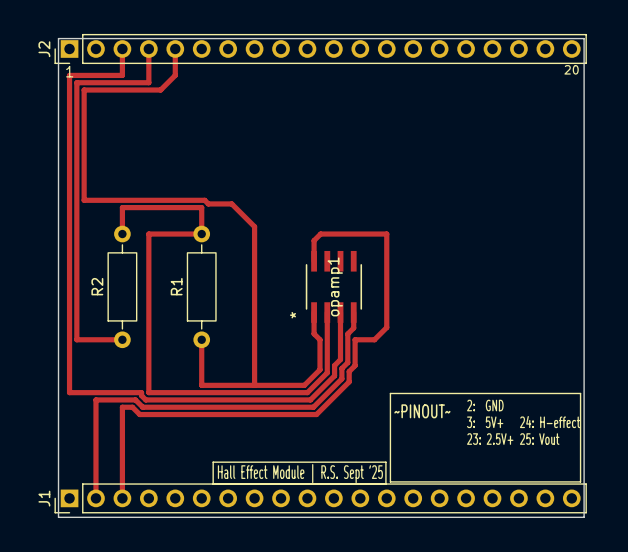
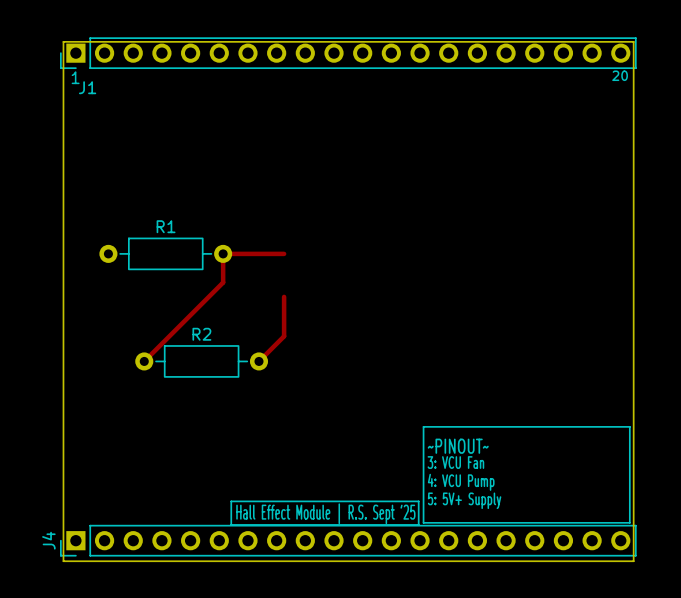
track: (122, 48) (122, 75) (69, 75) (69, 392) (141, 392) (141, 395) (145, 399) (310, 399) (334, 375) (334, 365) (340, 359) (340, 312) -> none
track: (148, 48) (148, 82) (76, 82) (76, 339) (122, 339) -> none
track: (175, 48) (175, 75) (160, 90) (84, 90) (84, 200) (204, 200) (208, 203) (231, 203) (254, 226) (254, 385) -> none
J2: (320, 48) -> none
track: (122, 234) (122, 207) (201, 207) (201, 234) (148, 234) (148, 392) (307, 392) (327, 372) (327, 312) -> none
track: none -> (284, 253) (223, 253) (223, 282) (144, 361)
track: (314, 261) (314, 240) (320, 234) (386, 234) (386, 327) (374, 339) (355, 339) (355, 365) (349, 371) (349, 381) (316, 414) (139, 414) (132, 407) (122, 407) (122, 498) -> none
track: none -> (284, 296) (284, 336) (258, 361)
R2 rotation: 0° (122, 286) -> 90° clockwise (201, 361)
R2 position: (122, 286) -> (201, 361)
R1 rotation: 0° (201, 286) -> 90° clockwise (165, 253)
opamp1: (333, 286) -> none
track: (314, 312) (314, 333) (319, 339) (319, 369) (304, 385) (201, 385) (201, 339) -> none
track: (353, 312) (353, 328) (347, 333) (347, 362) (341, 368) (341, 378) (313, 407) (142, 407) (135, 399) (95, 399) (95, 498) -> none
text: 2: GND (485, 405) -> none
text: 3: 5V+ (485, 422) -> none
text: 24: H-effect (550, 422) -> none
text: none -> 3: VCU Fan (455, 462)
text: 23: 2.5V+ (490, 439) -> none
text: 25: Vout (539, 439) -> none
text: none -> 4: VCU Pump (461, 482)
text: none -> 5: 5V+ Supply (464, 500)
J1 footprint: [54, 483, 587, 514] -> [60, 37, 637, 69]
J1 name position: J1 (44, 498) -> J1 (87, 87)
J4: none -> (348, 540)

